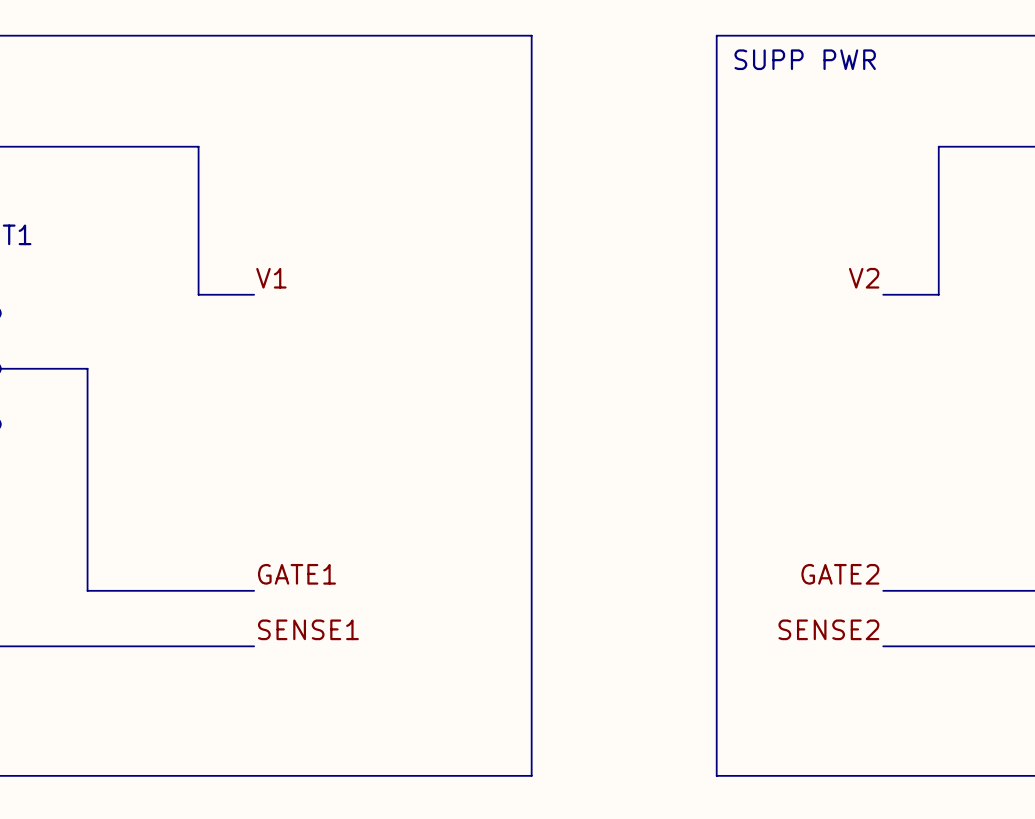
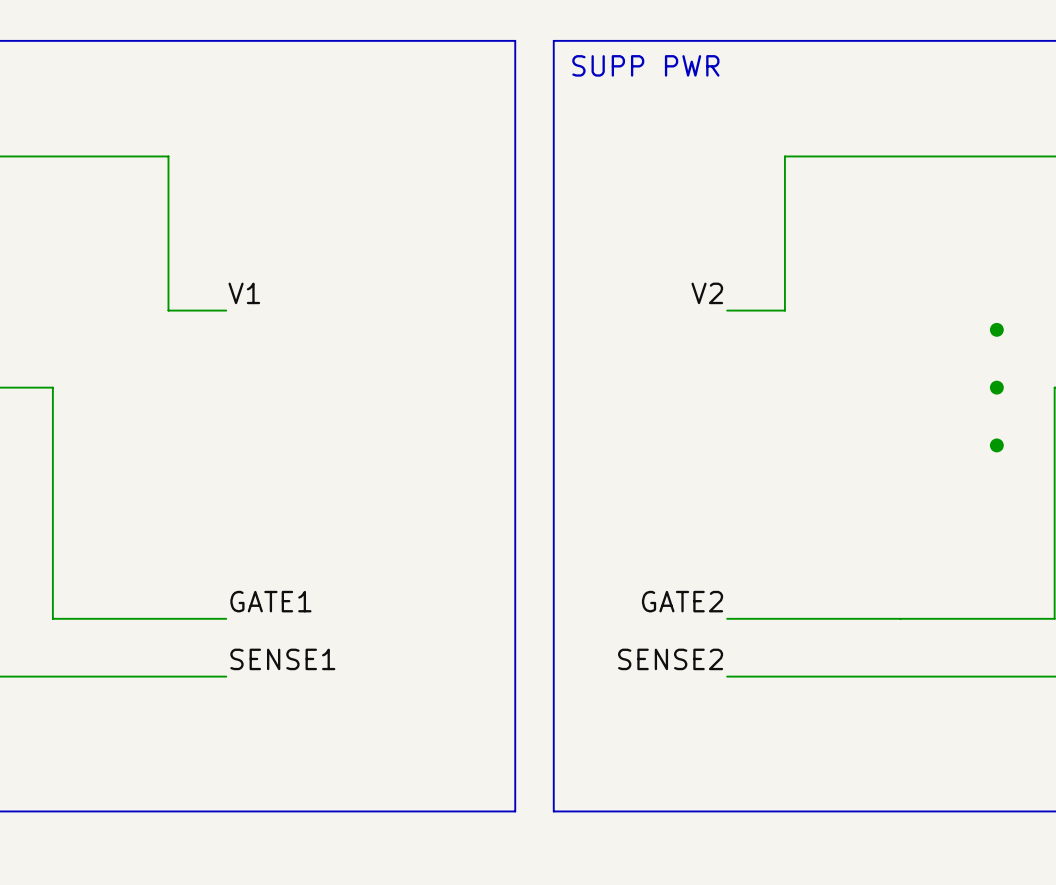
line: (716, 35) (716, 775) -> (707, 40) (553, 40) (553, 811) (707, 811)
text position: SUPP PWR (805, 59) -> SUPP PWR (645, 65)
wire: (938, 146) (938, 294) (883, 294) -> (939, 156) (784, 156) (784, 310) (727, 310)
label position: V2 (864, 278) -> V2 (707, 293)
junction: none -> (996, 329)
junction: none -> (996, 387)
junction: none -> (996, 445)
label position: GATE2 (840, 574) -> GATE2 (682, 601)
wire: none -> (727, 618) (881, 618)
label position: SENSE2 (828, 629) -> SENSE2 (670, 659)
wire: none -> (727, 676) (881, 676)

